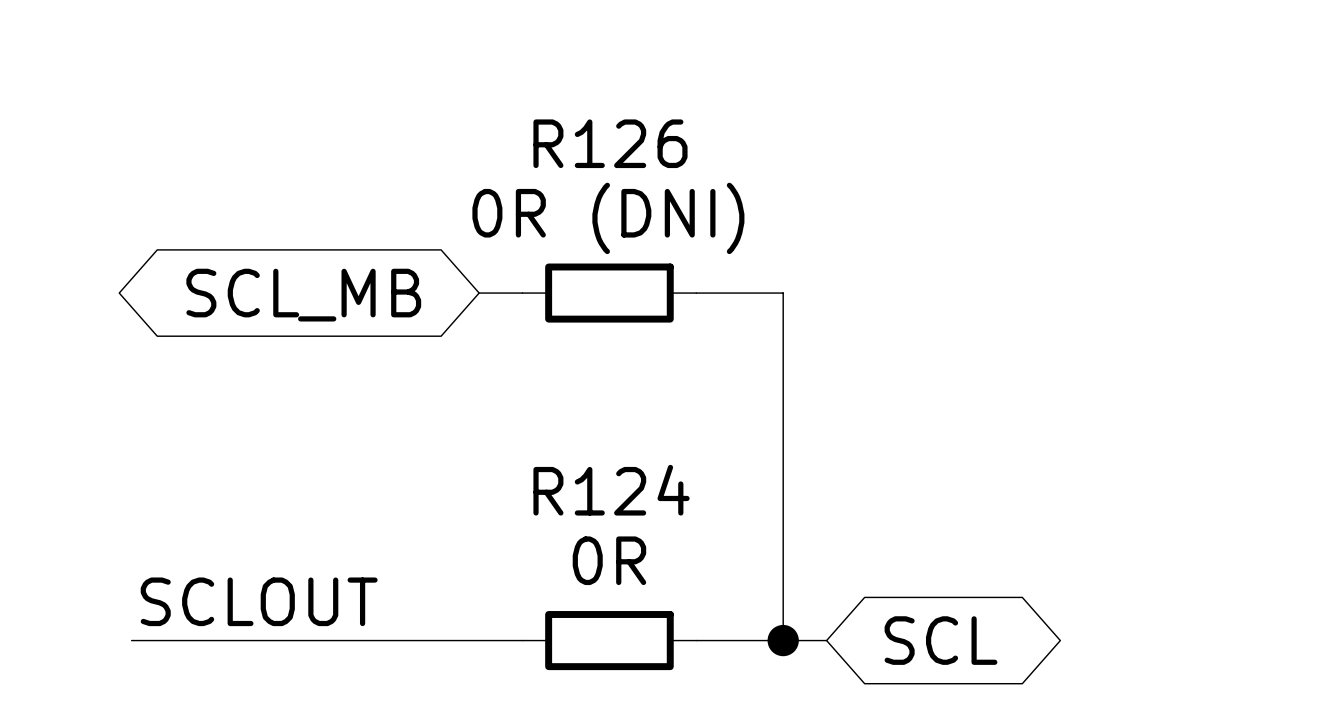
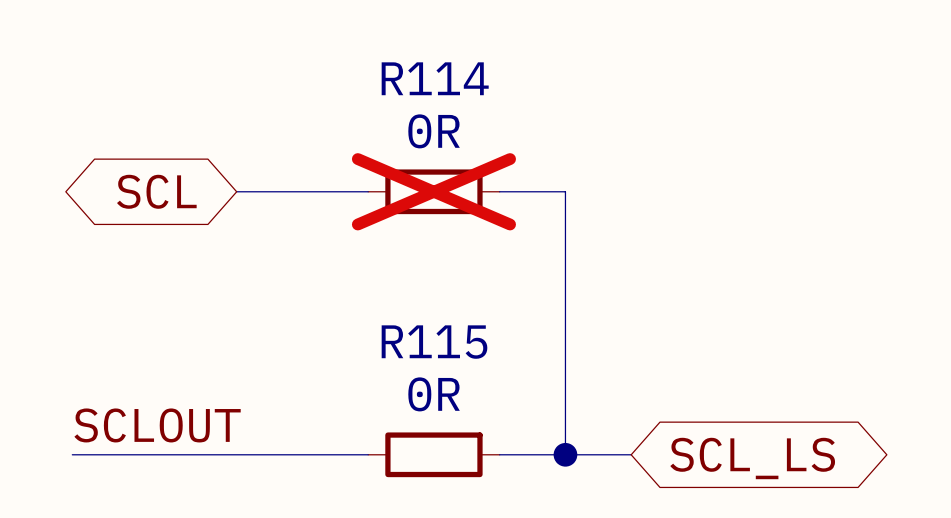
R126 name: R126 (610, 143) -> R114 (435, 78)
R126 value: 0R (DNI) (608, 218) -> 0R (434, 131)
wire: none -> (236, 191) (335, 191)
R126 do-not-place cross: none -> (433, 191)
global label: SCL_MB (303, 295) -> none
R124 name: R124 (611, 490) -> R115 (434, 342)
wire: none -> (598, 454) (631, 454)
global label rotation: 0° (940, 640) -> 180° (156, 191)
global label position: SCL (940, 640) -> SCL (156, 191)
global label: none -> SCL_LS (752, 458)

